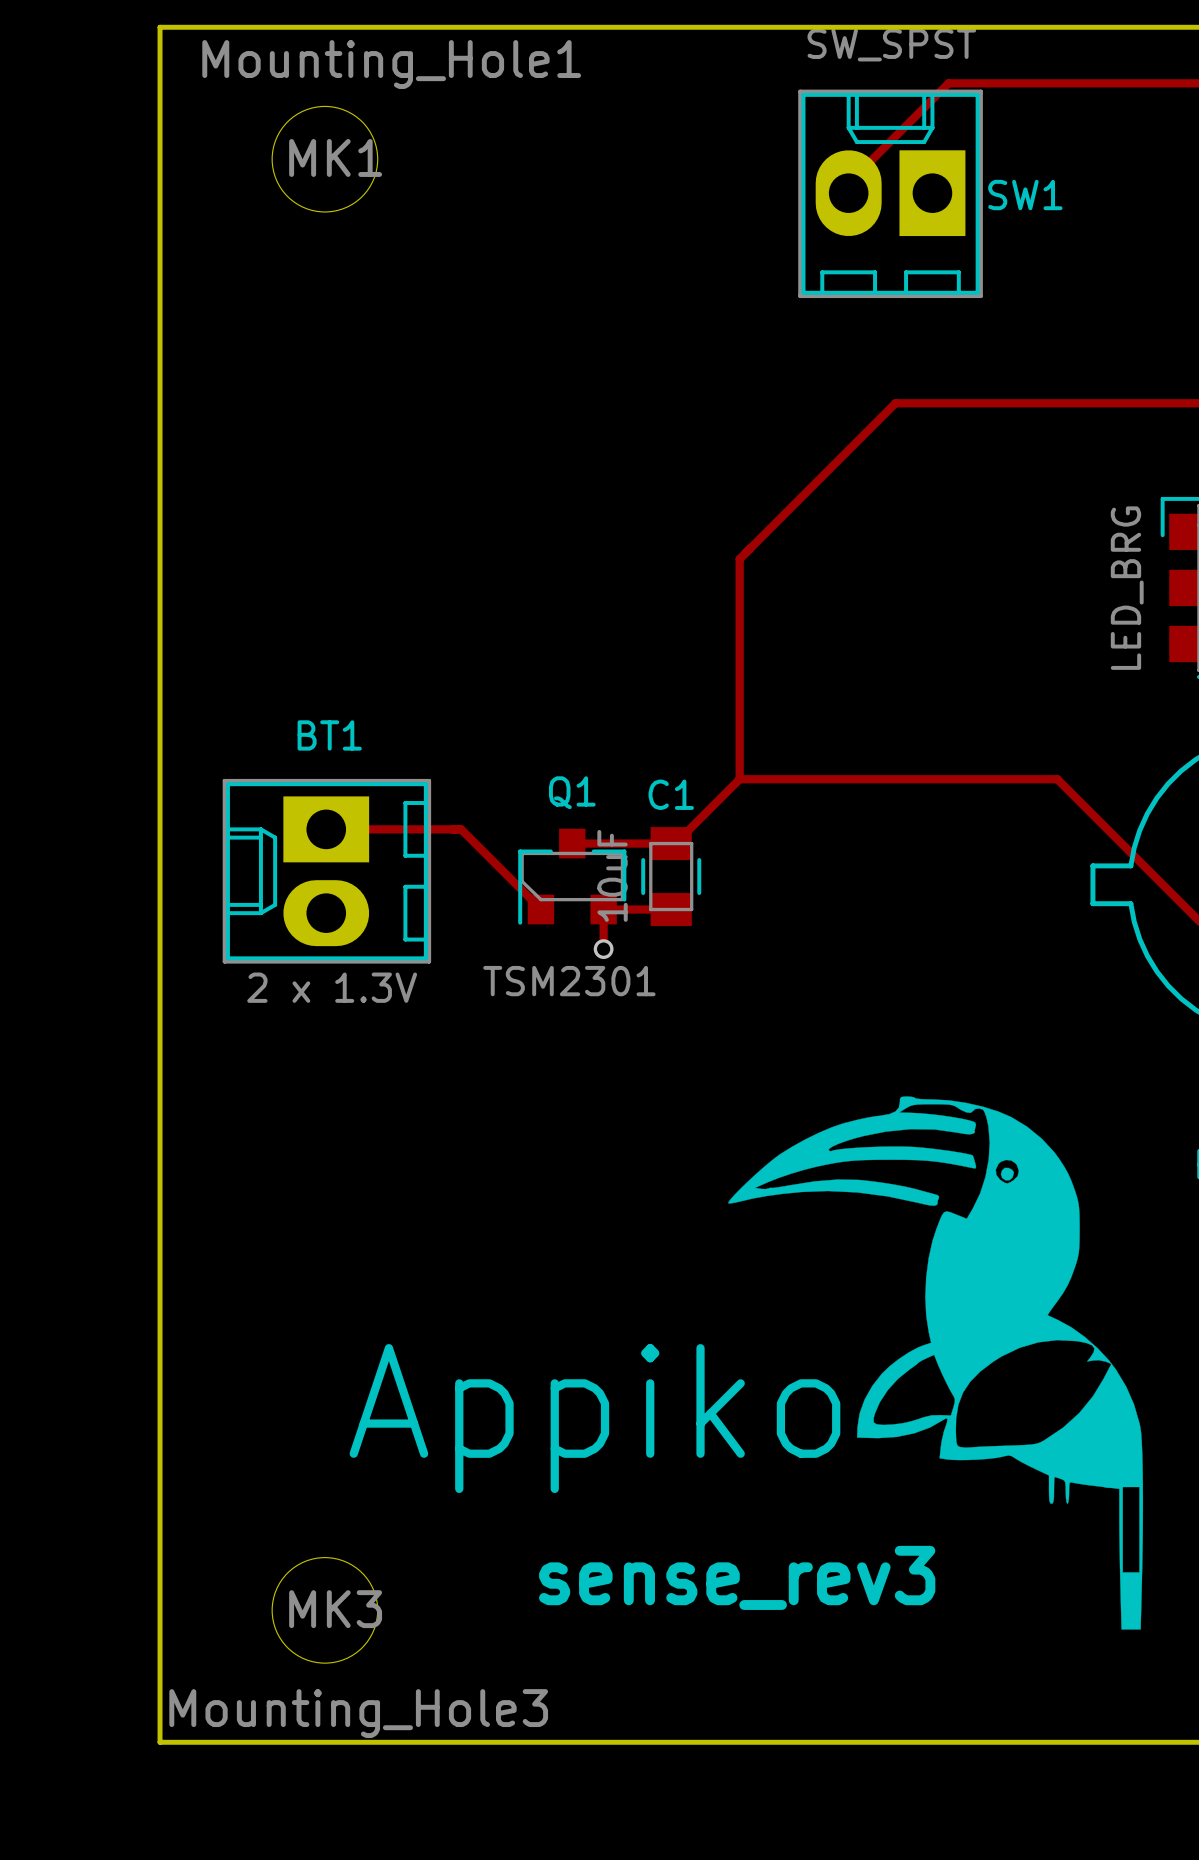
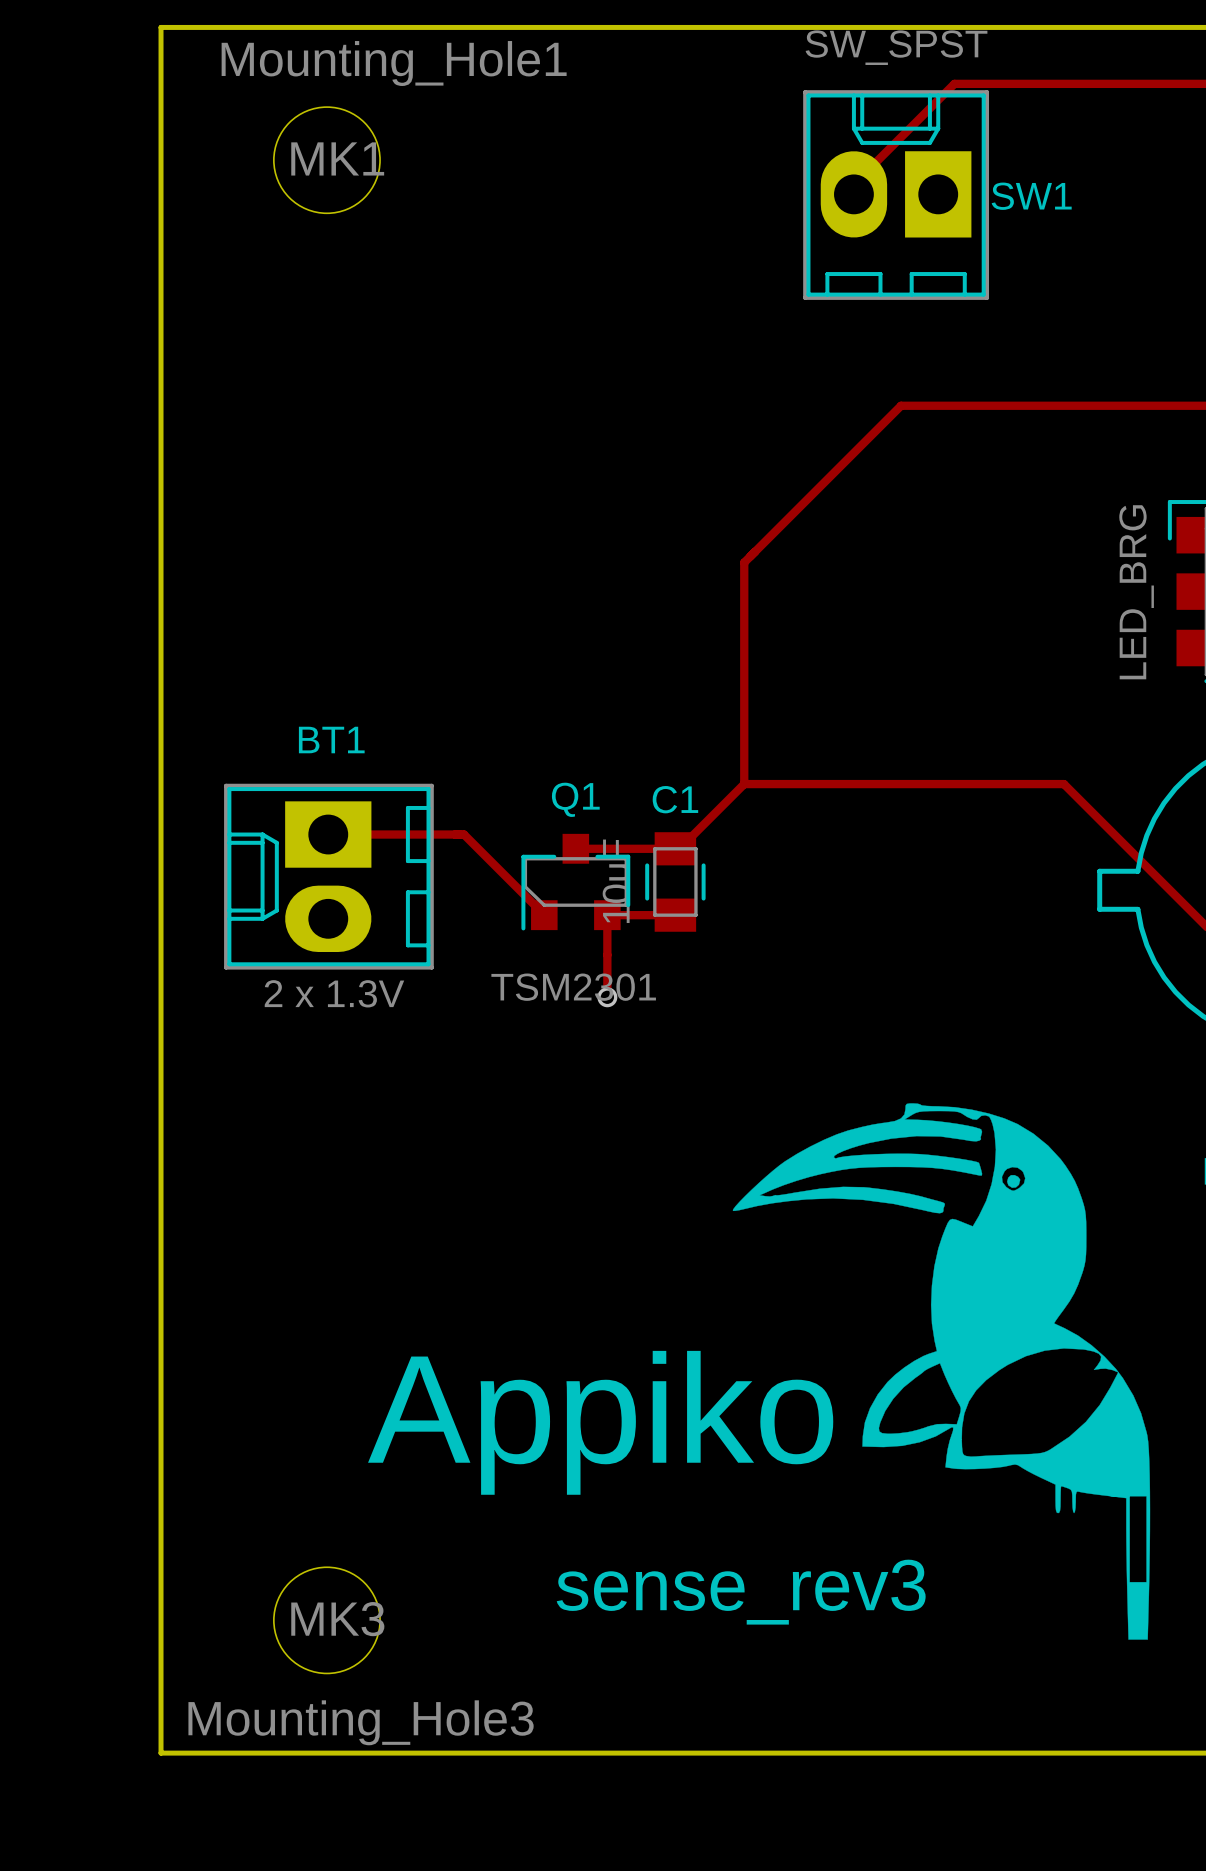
track: none -> (607, 954) (607, 997)
via position: (603, 949) -> (607, 997)

